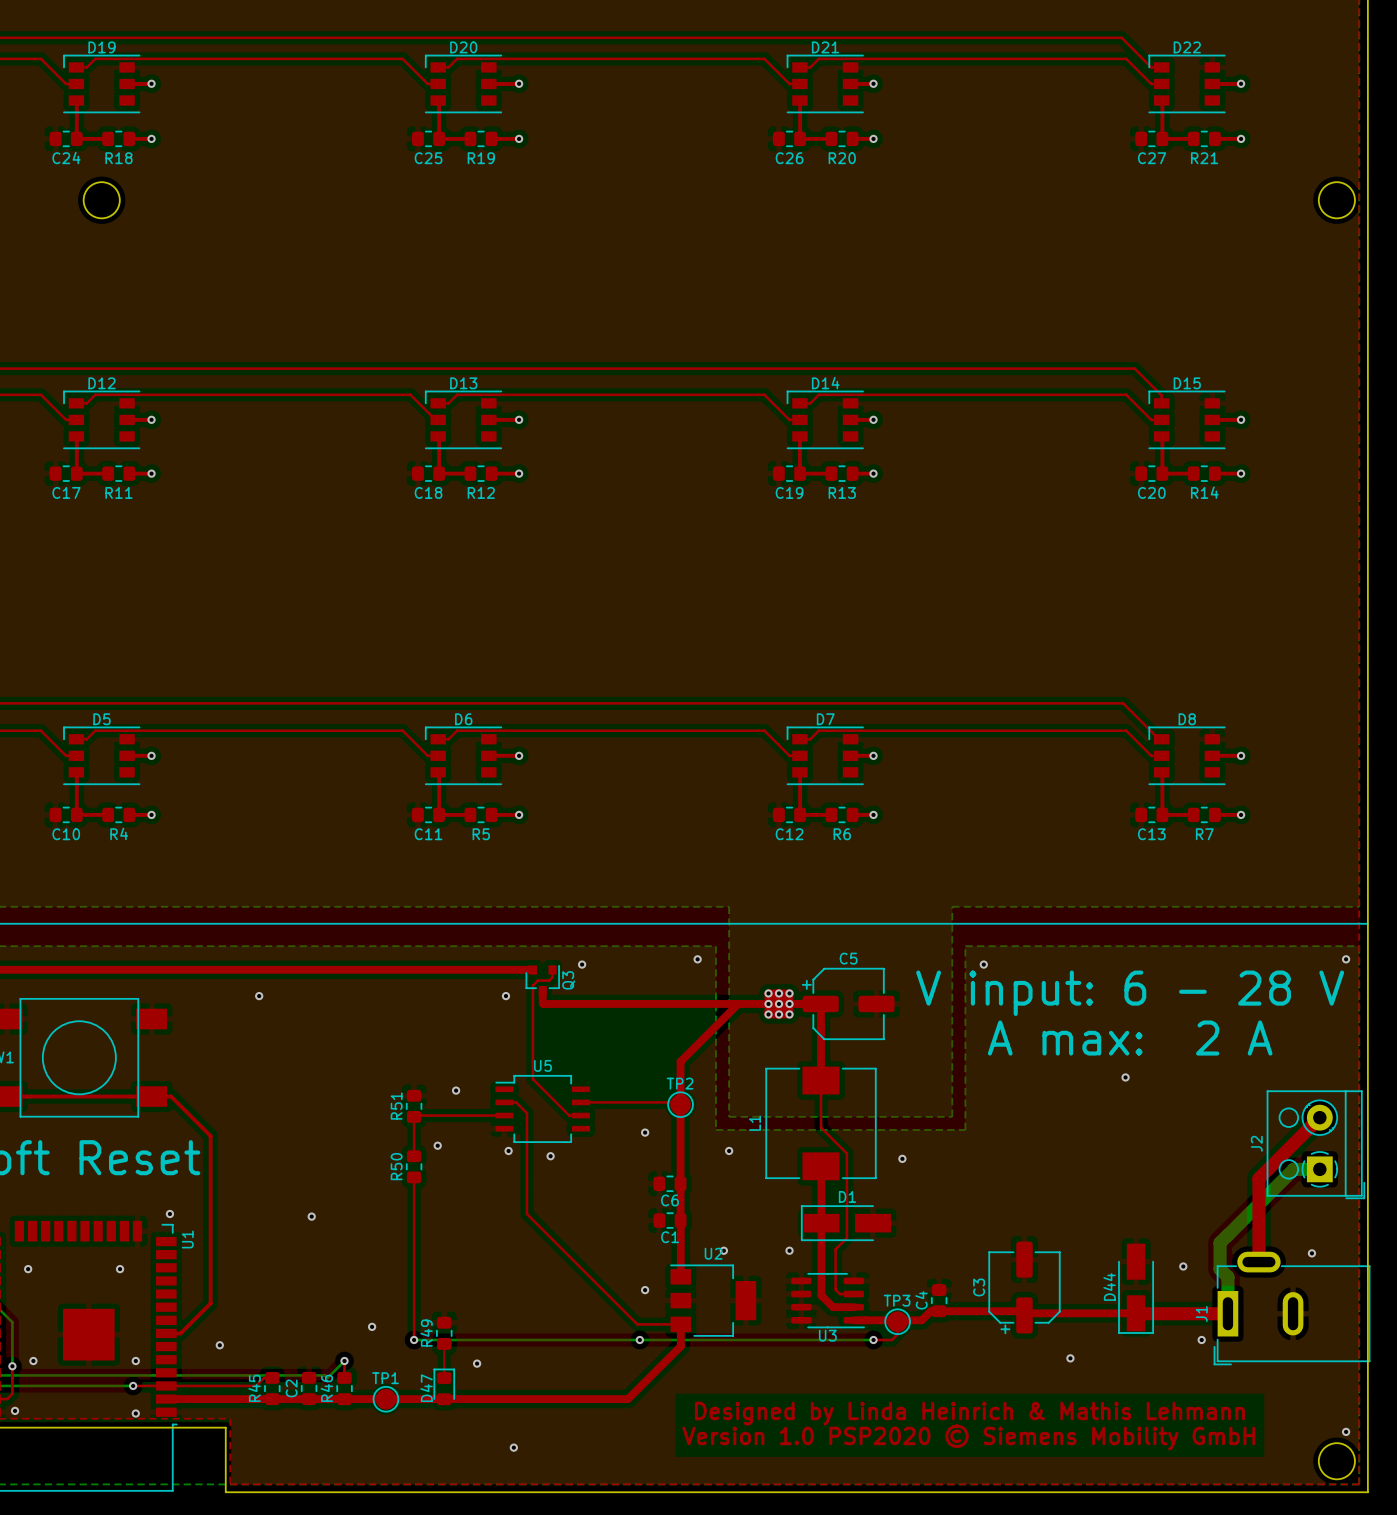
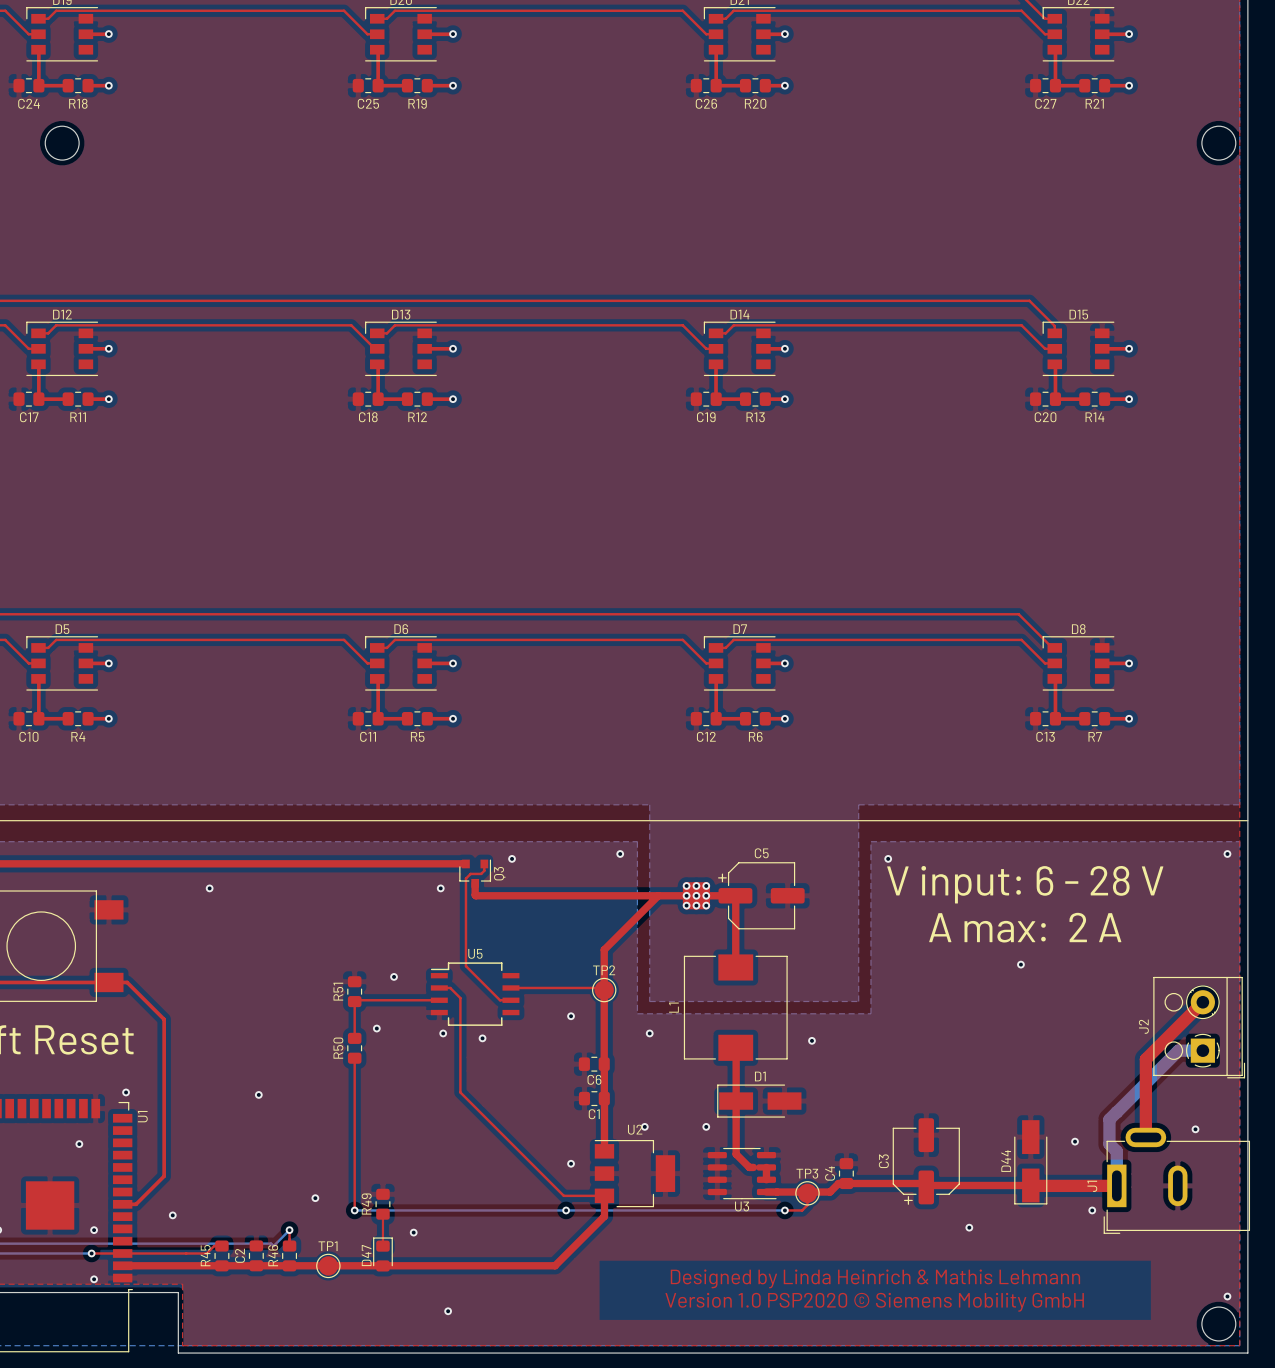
top track: (821, 1080) (821, 1127) (846, 1153) (846, 1237) (835, 1249) (835, 1289) (839, 1294) -> none
top track: (821, 1279) (821, 1295) (833, 1307) (853, 1307) -> (736, 1154) (749, 1167) (753, 1167)
top track: none -> (766, 1167) (766, 1179)

